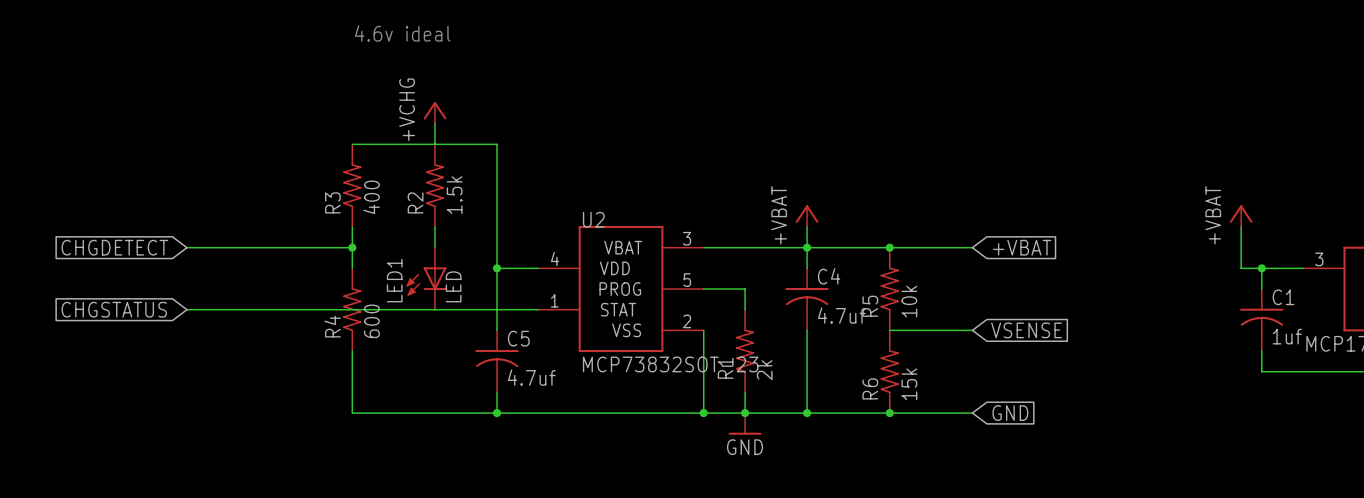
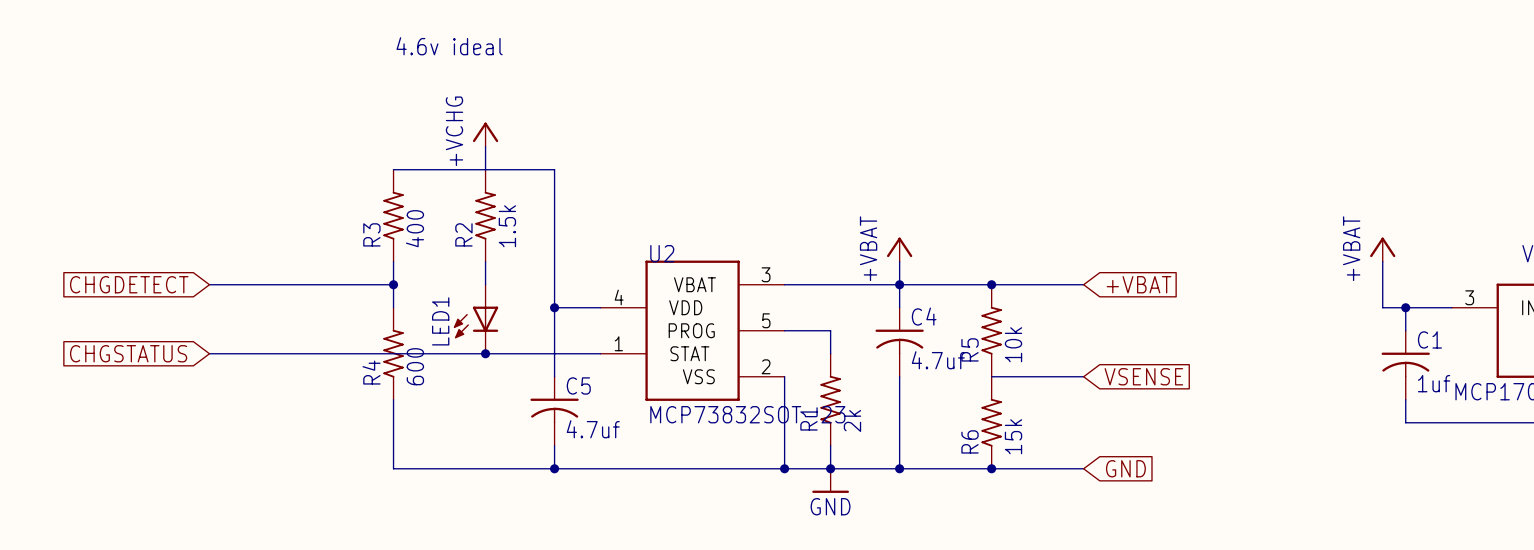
LED1 value: LED (453, 286) -> none
junction: none -> (485, 353)

